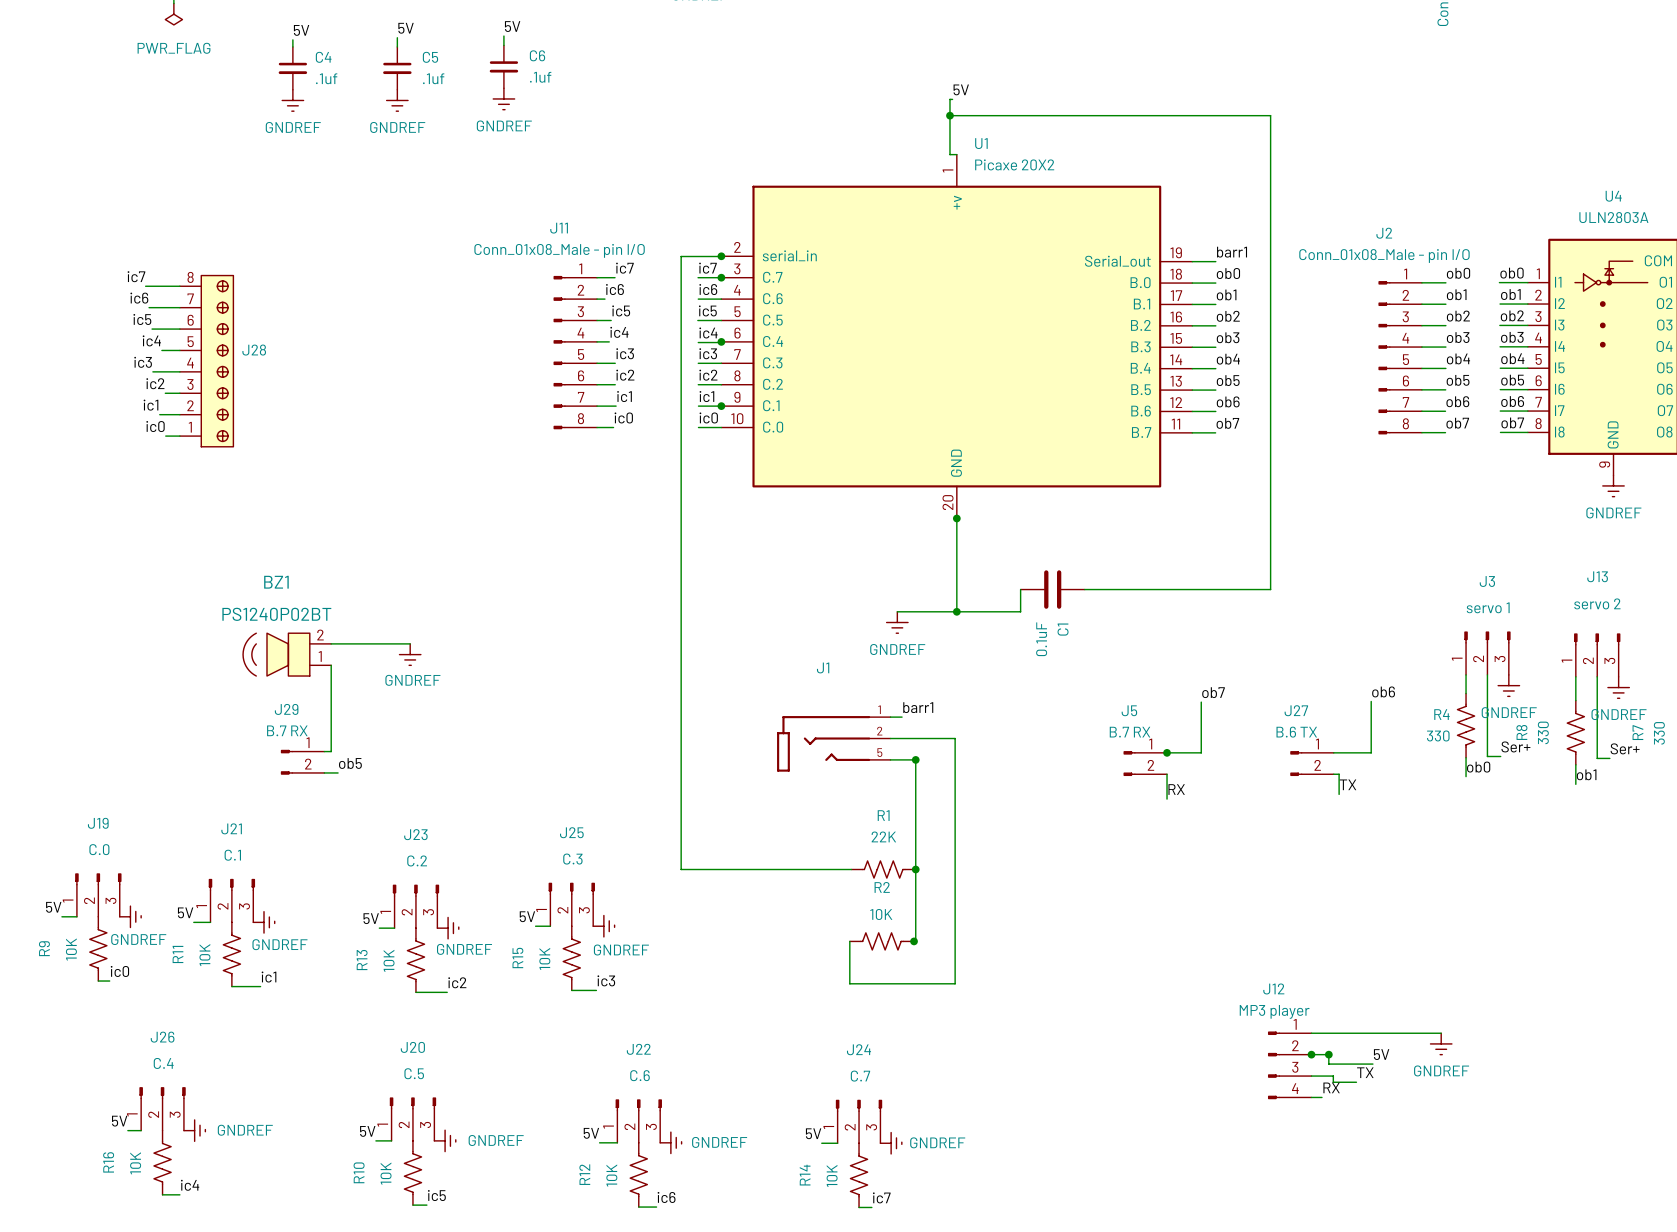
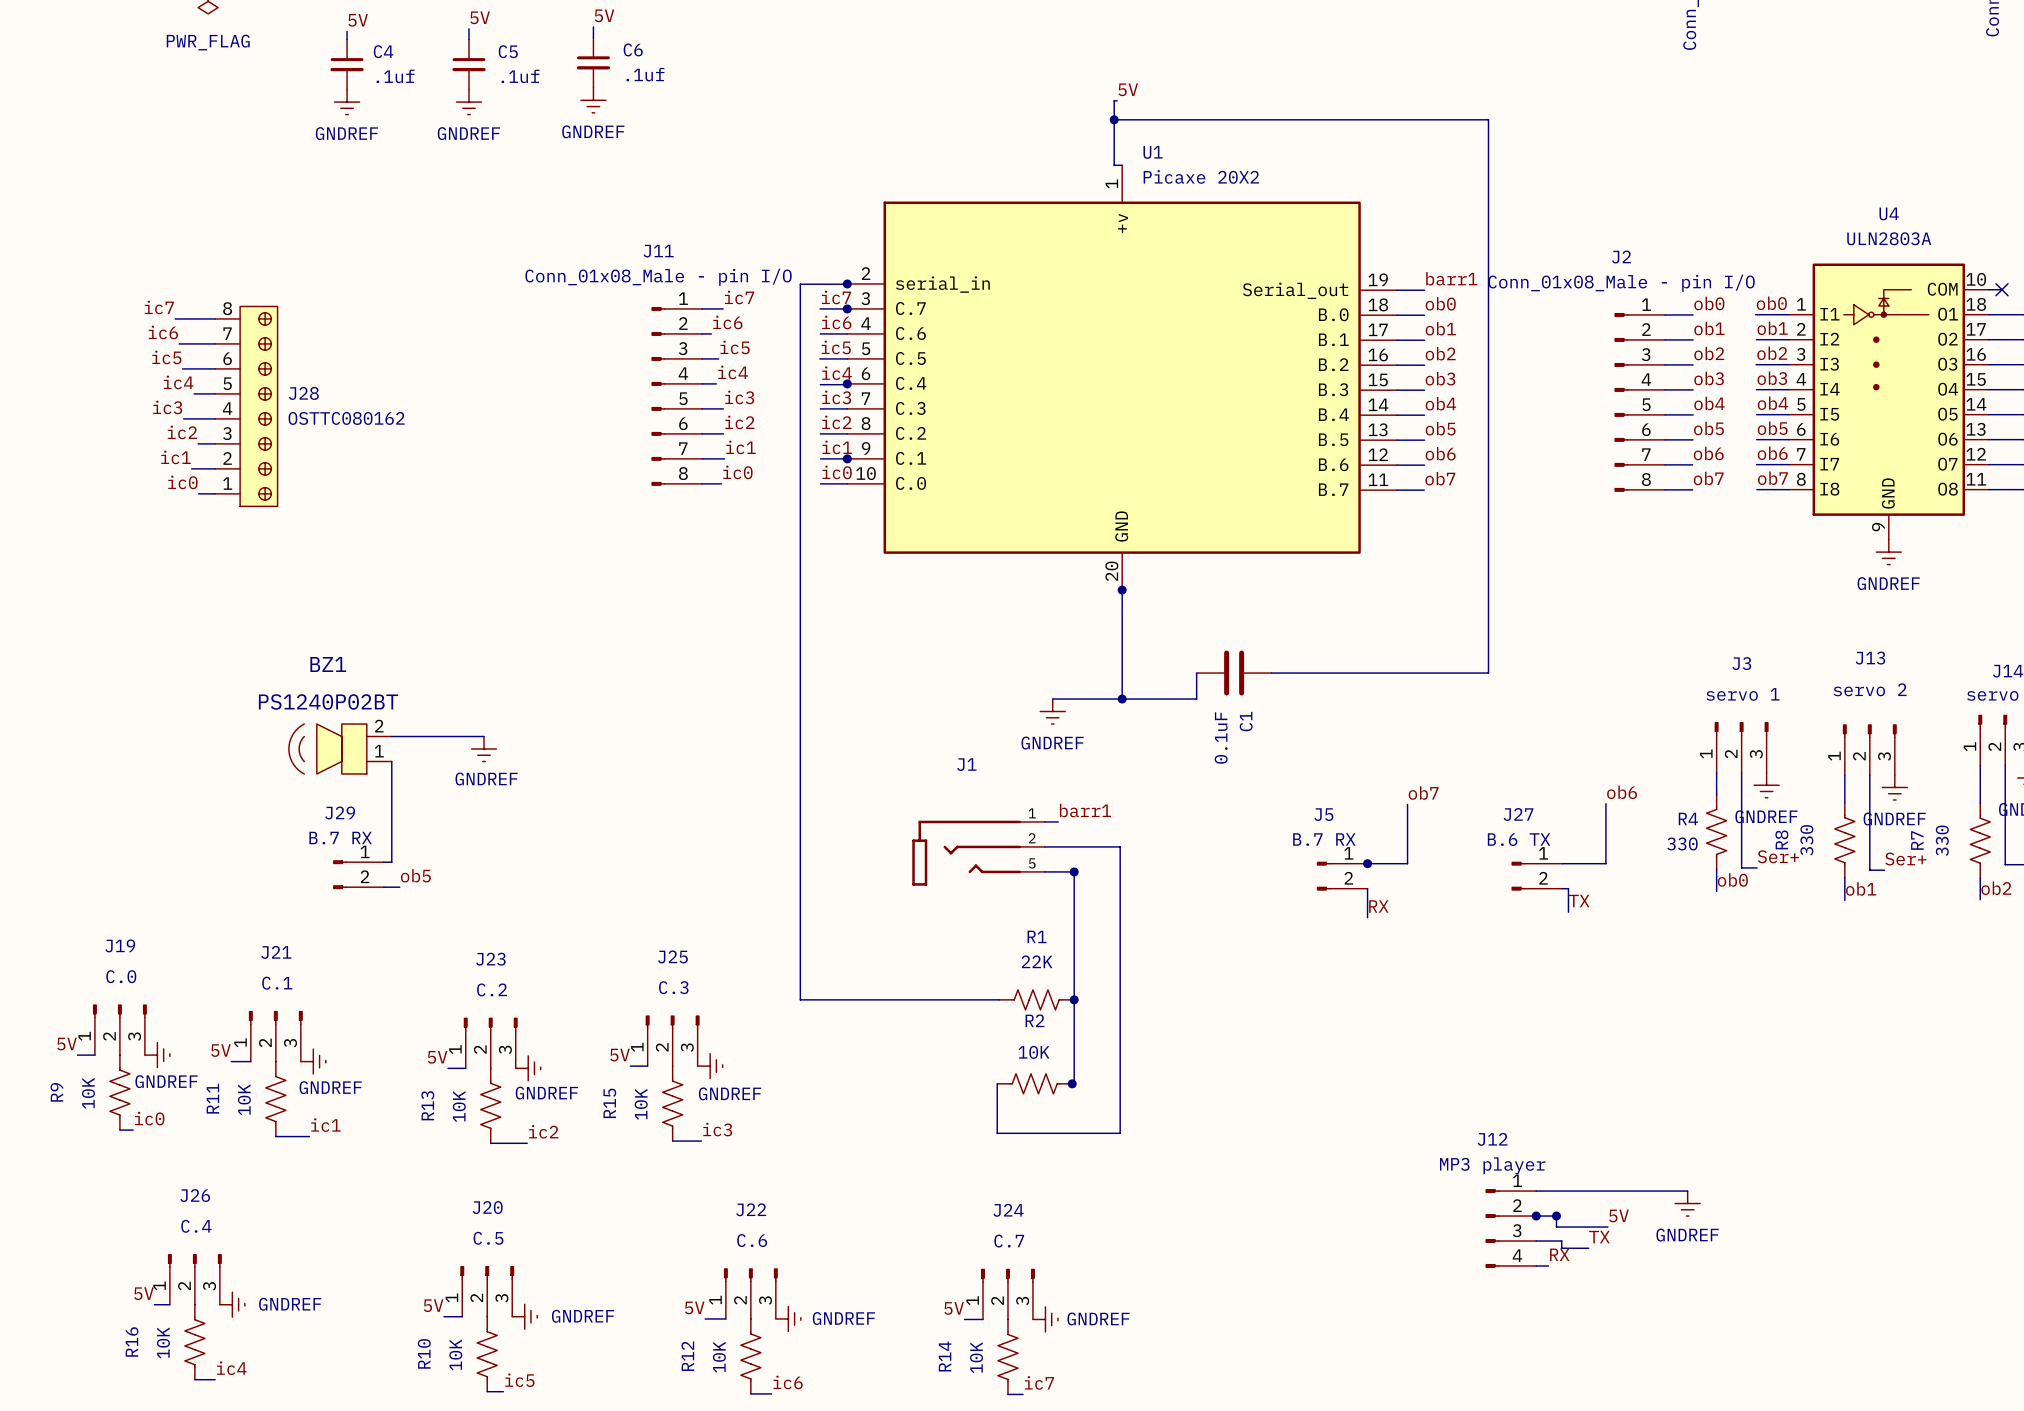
J28 value: none -> OSTTC080162 (346, 418)

